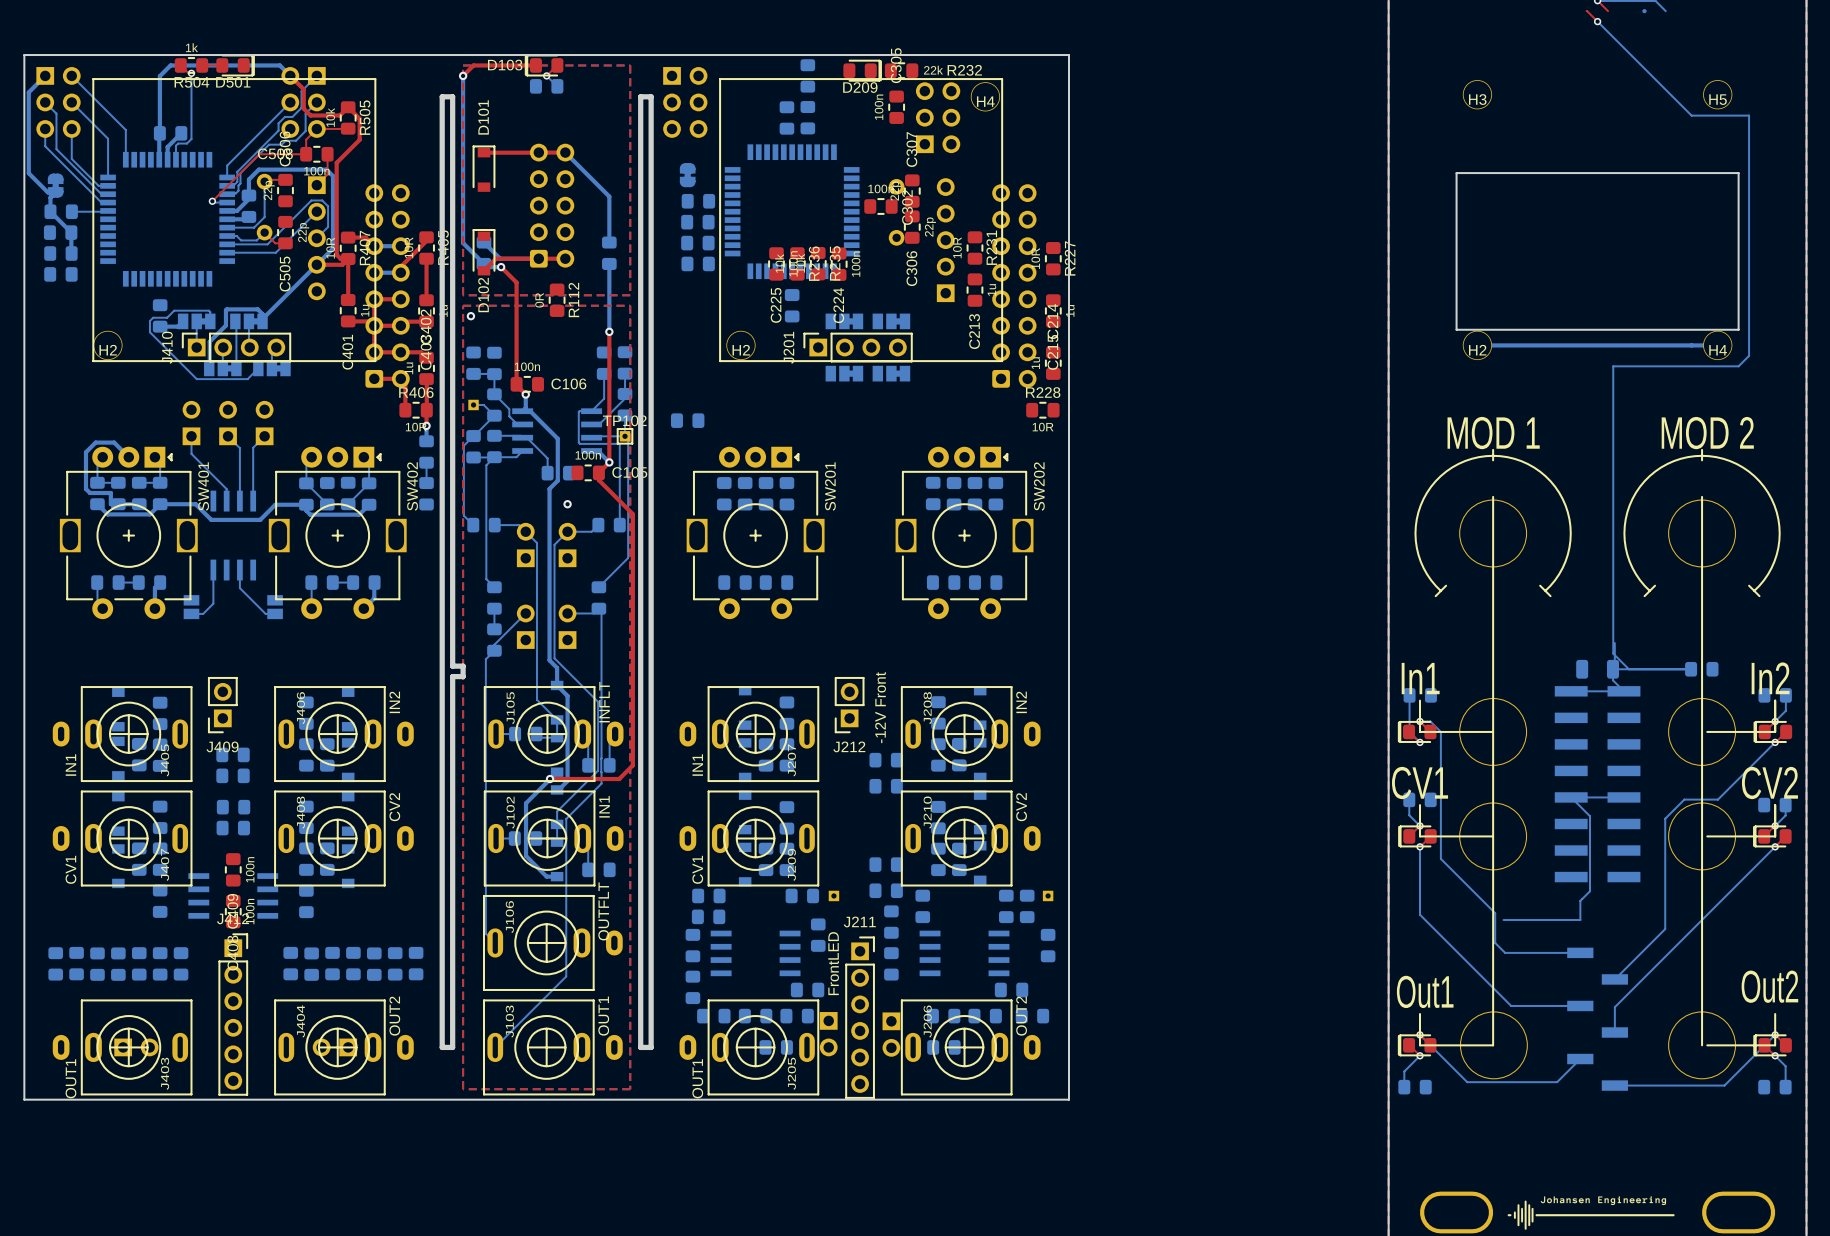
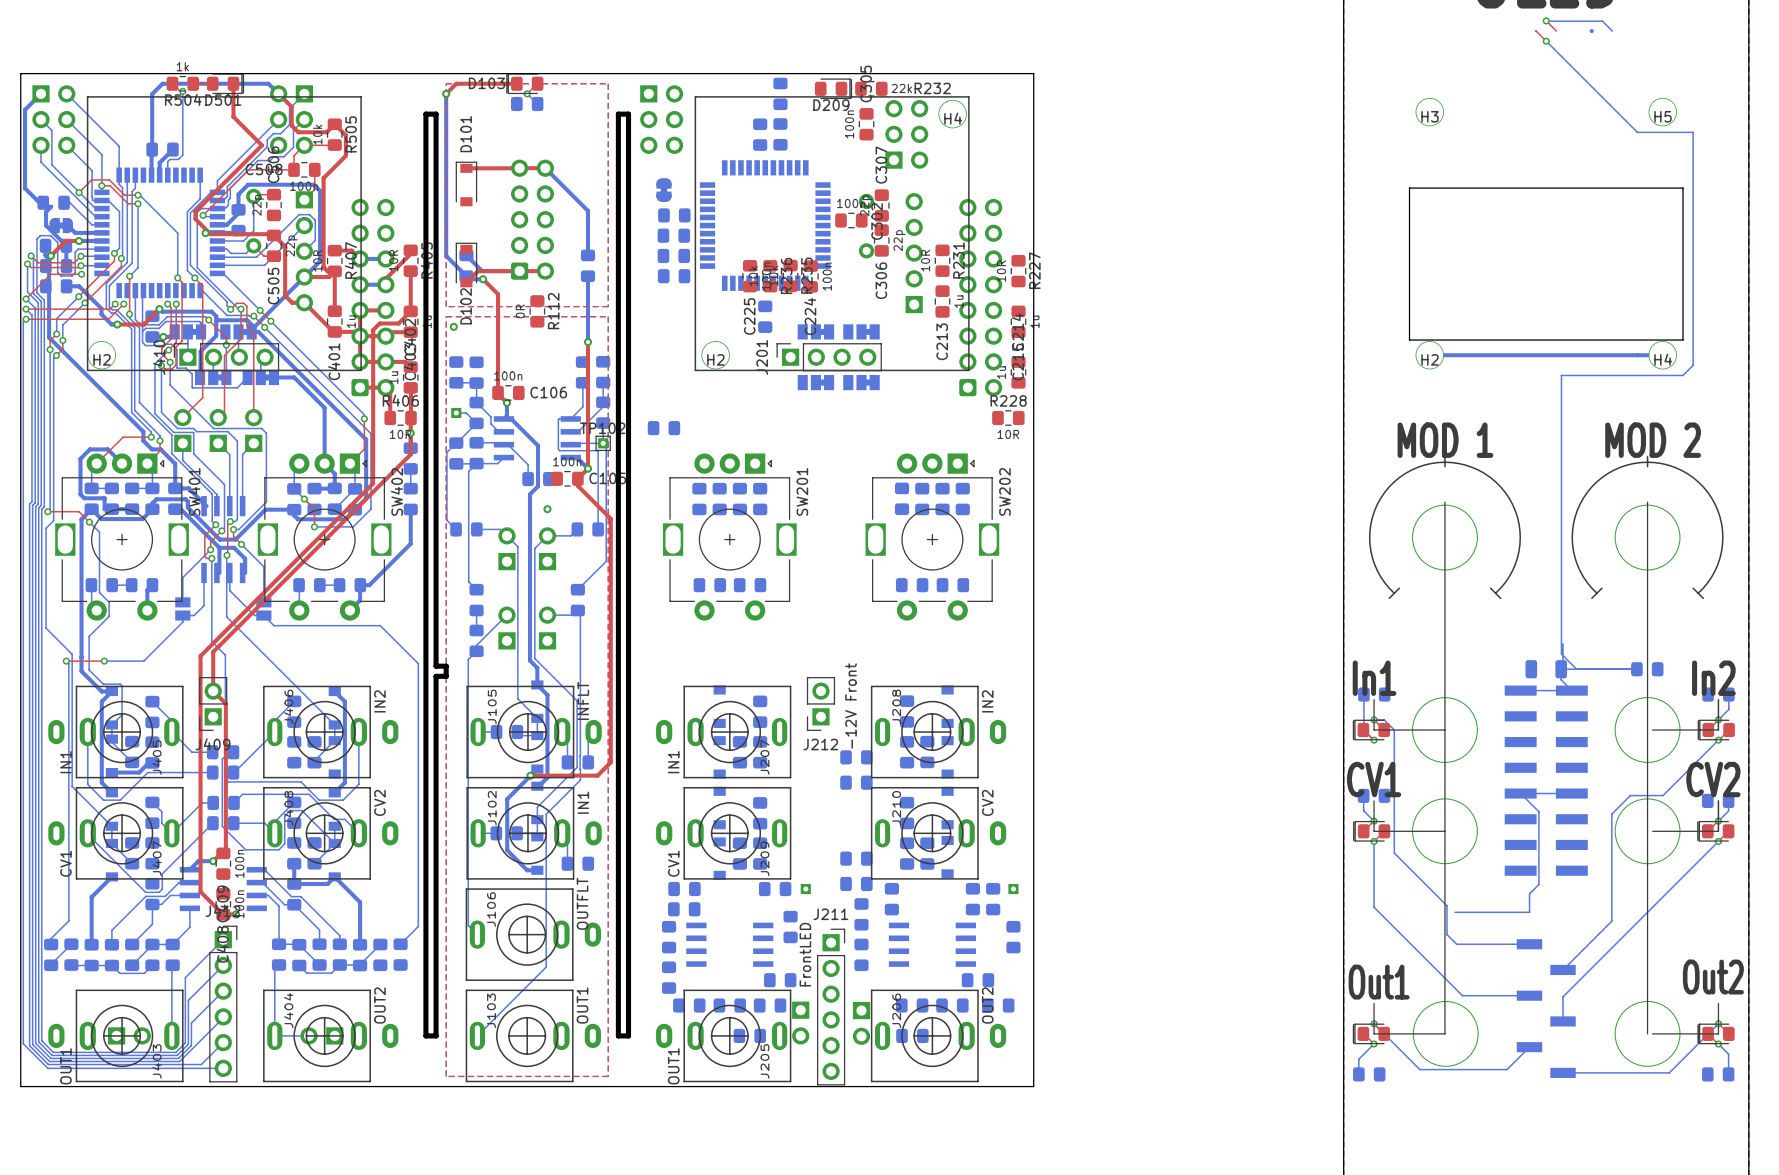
top track: none -> (233, 83) (233, 116) (261, 145) (195, 211) (195, 219) (210, 234) (272, 234) (285, 246) (285, 295) (292, 302) (304, 302) (334, 331)
bottom track: (71, 128) (71, 158) (98, 185) -> (66, 145) (92, 170) (92, 200)
bottom track: none -> (119, 175) (119, 184) (122, 187) (121, 258)
bottom track: none -> (127, 175) (127, 262) (106, 283) (106, 308) (111, 312) (115, 312) (131, 329) (131, 412) (151, 432) (151, 437)
bottom track: none -> (135, 175) (135, 188) (132, 191) (132, 263) (109, 285) (109, 306) (112, 309) (116, 309) (134, 327) (134, 410) (160, 435) (160, 440)
bottom track: none -> (200, 175) (200, 198) (187, 211) (187, 270) (194, 277)
top track: none -> (101, 185) (110, 185) (128, 203) (137, 203)
via: none -> (101, 185)
part footprint: [47, 173, 64, 198] -> [37, 195, 70, 210]
top track: none -> (78, 192) (91, 179) (109, 179) (124, 195) (137, 195)
via: none -> (78, 192)
bottom track: none -> (217, 192) (211, 192) (190, 212) (190, 265) (227, 301) (227, 305) (230, 309)
bottom track: none -> (137, 195) (177, 233) (177, 277)
via: none -> (137, 195)
bottom track: none -> (101, 200) (108, 200) (119, 211) (119, 248) (114, 253)
bottom track: none -> (64, 202) (69, 202) (91, 224) (101, 224)
bottom track: none -> (137, 203) (137, 267) (129, 276)
via: none -> (137, 203)
bottom track: none -> (217, 208) (201, 208) (197, 212) (197, 267) (238, 309) (241, 309)
part footprint: [44, 204, 78, 220] -> [49, 217, 73, 234]
bottom track: (71, 211) (107, 211) -> none
bottom track: none -> (67, 225) (75, 232) (101, 232)
via: none -> (205, 233)
bottom track: none -> (78, 241) (101, 241)
top track: none -> (78, 241) (65, 241) (50, 255)
via: none -> (78, 241)
bottom track: none -> (45, 245) (45, 255) (49, 258) (49, 337) (143, 431) (143, 440) (151, 449) (160, 449) (175, 463) (175, 488) (188, 488) (206, 506)
bottom track: none -> (101, 249) (78, 249) (75, 252) (75, 272) (72, 275) (61, 275) (57, 272) (57, 242) (50, 235) (40, 235) (36, 239) (36, 292) (44, 300) (44, 506) (41, 509) (41, 1040) (53, 1052) (175, 1052) (185, 1043) (185, 977) (223, 939)
top track: none -> (114, 253) (114, 260) (78, 296)
via: none -> (114, 253)
bottom track: none -> (31, 255) (33, 258) (33, 293) (41, 301) (41, 505) (38, 507) (38, 1041) (52, 1055) (177, 1055) (188, 1044) (188, 1000) (223, 965)
top track: none -> (31, 255) (37, 262) (74, 262) (81, 256)
via: none -> (31, 255)
via: none -> (50, 255)
bottom track: none -> (81, 256) (101, 257)
via: none -> (81, 256)
top track: none -> (121, 258) (121, 266) (85, 302)
via: none -> (121, 258)
bottom track: none -> (27, 264) (27, 292) (38, 302) (38, 504) (35, 506) (35, 1043) (50, 1058) (178, 1058) (191, 1045) (191, 1023) (223, 991)
top track: none -> (27, 264) (31, 267) (79, 267) (81, 265)
via: none -> (27, 264)
bottom track: none -> (101, 265) (81, 265)
via: none -> (81, 265)
top track: none -> (81, 274) (50, 274) (26, 298)
via: none -> (81, 274)
bottom track: none -> (217, 273) (223, 273) (260, 310)
top track: none -> (129, 276) (129, 314)
via: none -> (129, 276)
top track: none -> (177, 277) (182, 282) (182, 341) (175, 347) (175, 365) (171, 369) (165, 369) (161, 365)
via: none -> (177, 277)
top track: none -> (194, 277) (202, 285) (202, 397) (182, 417)
via: none -> (194, 277)
bottom track: none -> (66, 286) (79, 286) (101, 308) (101, 314) (111, 324) (117, 324)
bottom track: none -> (135, 290) (135, 319) (142, 326) (142, 331)
bottom track: none -> (143, 290) (142, 321) (145, 324) (159, 324) (167, 316) (205, 316) (208, 319)
bottom track: none -> (200, 290) (227, 315) (253, 316)
bottom track: none -> (78, 296) (56, 318) (56, 334)
via: none -> (78, 296)
bottom track: none -> (26, 298) (35, 308) (35, 502) (32, 505) (32, 1044) (49, 1061) (179, 1061) (223, 1016)
via: none -> (26, 298)
bottom track: none -> (85, 302) (62, 325) (62, 340)
via: none -> (85, 302)
top track: none -> (115, 304) (110, 309) (26, 309)
via: none -> (115, 304)
top track: none -> (123, 304) (108, 319) (26, 319)
via: none -> (123, 304)
top track: none -> (167, 304) (171, 307) (171, 338) (161, 348) (161, 353) (170, 362)
via: none -> (167, 304)
top track: none -> (176, 304) (176, 342) (168, 350)
via: none -> (176, 304)
bottom track: none -> (26, 309) (31, 315) (31, 501) (29, 504) (29, 1045) (48, 1064) (201, 1064) (223, 1042)
via: none -> (26, 309)
top track: none -> (159, 309) (144, 324) (117, 324)
via: none -> (159, 309)
top track: none -> (241, 309) (241, 339) (224, 355) (224, 411) (218, 417)
via: none -> (241, 309)
top track: none -> (230, 309) (236, 303) (243, 303) (246, 306) (246, 325) (253, 332) (253, 417)
via: none -> (230, 309)
top track: none -> (260, 310) (270, 321)
via: none -> (260, 310)
top track: none -> (410, 311) (398, 323) (379, 323) (373, 330) (373, 483) (200, 656) (200, 891) (223, 914) (235, 914)
bottom track: none -> (129, 314) (129, 318) (139, 327) (139, 402) (171, 434) (171, 453) (212, 494) (212, 521) (215, 524)
via: none -> (129, 314)
bottom track: none -> (152, 316) (159, 308) (162, 311) (211, 311) (216, 316) (216, 321)
top track: none -> (253, 316) (264, 327)
via: none -> (253, 316)
bottom track: none -> (26, 319) (23, 322) (23, 1043) (47, 1068) (223, 1068)
via: none -> (26, 319)
top track: none -> (208, 319) (226, 337) (226, 345)
via: none -> (208, 319)
bottom track: none -> (270, 321) (364, 414) (364, 418)
via: none -> (270, 321)
via: none -> (117, 324)
bottom track: none -> (264, 327) (370, 433) (370, 509) (353, 526) (314, 526)
via: none -> (264, 327)
bottom track: none -> (251, 331) (258, 331) (366, 439) (366, 498) (355, 509)
top track: none -> (56, 334) (50, 340) (50, 349)
via: none -> (56, 334)
via: none -> (163, 336)
top track: none -> (62, 340) (62, 349) (56, 355)
via: none -> (62, 340)
via: none -> (226, 345)
bottom track: (153, 335) (196, 379) (201, 379) -> (145, 345) (171, 344) (176, 349) (176, 367) (186, 368) (192, 374) (192, 387)
bottom track: none -> (50, 349) (50, 509) (47, 511)
via: none -> (50, 349)
bottom track: none -> (168, 350) (154, 363) (154, 413) (173, 432) (193, 432) (193, 453) (224, 484) (224, 528) (221, 530)
via: none -> (168, 350)
bottom track: none -> (56, 355) (53, 358) (53, 520) (46, 528) (46, 628) (72, 654) (72, 786) (111, 826) (111, 843) (132, 863)
via: none -> (56, 355)
bottom track: none -> (170, 362) (170, 385) (213, 428) (261, 428) (266, 433) (266, 501) (238, 529) (233, 529)
via: none -> (170, 362)
bottom track: none -> (161, 365) (161, 412) (177, 428) (193, 428) (196, 431) (227, 431) (237, 441) (237, 519) (230, 521)
via: none -> (161, 365)
bottom track: none -> (273, 377) (294, 377) (324, 407) (324, 463) (334, 473) (334, 488) (314, 488)
top track: none -> (364, 418) (364, 449) (349, 463)
via: none -> (364, 418)
top track: none -> (410, 433) (410, 454) (213, 651) (213, 691) (225, 703) (225, 850) (213, 861)
top track: none -> (151, 437) (123, 437) (96, 463)
via: none -> (151, 437)
top track: none -> (160, 440) (160, 450) (147, 463)
via: none -> (160, 440)
part: none -> (175, 498)
top track: none -> (304, 499) (314, 509) (314, 526)
via: none -> (304, 499)
bottom track: none -> (91, 509) (81, 519) (81, 671) (101, 691) (111, 691) (101, 701) (101, 782) (111, 792)
bottom track: (160, 504) (183, 504) -> none
bottom track: (189, 504) (195, 504) (211, 519) (260, 519) (276, 504) -> (152, 509) (152, 503) (156, 499) (185, 499) (187, 501) (187, 507) (219, 539) (235, 539) (265, 509)
bottom track: none -> (180, 509) (219, 547)
bottom track: none -> (410, 509) (410, 543) (369, 585) (360, 585)
top track: none -> (47, 511) (78, 511) (89, 522)
via: none -> (47, 511)
top track: none -> (230, 521) (227, 524) (227, 555)
via: none -> (230, 521)
bottom track: none -> (89, 522) (99, 532) (99, 592) (109, 602) (109, 616) (89, 636) (89, 669) (103, 683) (120, 684) (122, 685) (122, 714) (111, 724) (111, 742) (132, 762)
via: none -> (89, 522)
top track: none -> (215, 524) (204, 535) (204, 556) (211, 558)
via: none -> (215, 524)
via: none -> (314, 526)
top track: none -> (233, 529) (233, 536) (241, 544)
via: none -> (233, 529)
top track: none -> (221, 530) (210, 542) (210, 549)
via: none -> (221, 530)
bottom track: none -> (241, 544) (263, 566) (263, 602)
via: none -> (241, 544)
bottom track: none -> (219, 547) (219, 573)
bottom track: none -> (219, 547) (234, 547) (245, 558) (245, 573)
bottom track: none -> (210, 549) (182, 577) (182, 602)
via: none -> (210, 549)
bottom track: none -> (227, 555) (226, 616) (334, 724) (334, 740) (314, 762)
via: none -> (227, 555)
bottom track: none -> (211, 558) (211, 641) (225, 655) (225, 756) (222, 759) (222, 826) (245, 849) (278, 849) (284, 844) (284, 816) (290, 810) (301, 810) (334, 843)
via: none -> (211, 558)
bottom track: none -> (182, 615) (182, 622) (143, 661) (104, 661)
bottom track: none -> (263, 615) (273, 625) (380, 625) (418, 663) (418, 926) (400, 944)
bottom track: none -> (66, 661) (68, 663) (68, 920) (51, 938) (51, 944)
top track: none -> (66, 661) (104, 661)
via: none -> (66, 661)
via: none -> (104, 661)
bottom track: none -> (334, 691) (344, 701) (344, 782) (334, 792)
bottom track: none -> (152, 701) (171, 721) (171, 732) (192, 752) (212, 752)
bottom track: none -> (294, 701) (274, 720) (274, 732) (233, 772)
bottom track: none -> (87, 732) (87, 784) (103, 800) (120, 800) (147, 772) (212, 772)
bottom track: none -> (358, 732) (358, 784) (343, 800) (319, 800) (301, 781) (228, 781) (225, 779) (225, 760) (233, 752)
bottom track: none -> (152, 762) (148, 762) (139, 772) (111, 772)
bottom track: none -> (152, 802) (161, 811) (161, 823) (171, 833) (202, 802) (213, 802)
bottom track: none -> (294, 802) (274, 821) (274, 833) (264, 823) (233, 823)
bottom track: none -> (233, 802) (242, 794) (309, 794) (334, 819) (344, 819) (358, 833)
bottom track: none -> (212, 823) (162, 873) (162, 889) (159, 892) (145, 892) (87, 833)
bottom track: none -> (334, 826) (334, 843)
bottom track: none -> (334, 843) (314, 863)
bottom track: none -> (213, 861) (198, 861) (189, 869)
via: none -> (213, 861)
bottom track: none -> (294, 863) (294, 883) (327, 883) (334, 876) (360, 902) (360, 944)
bottom track: none -> (256, 869) (264, 869) (291, 896) (300, 896) (339, 935) (339, 944)
bottom track: none -> (111, 876) (91, 897) (91, 944)
bottom track: none -> (189, 882) (179, 882) (165, 896) (145, 896) (111, 930) (111, 944)
bottom track: none -> (256, 882) (262, 882) (284, 904) (294, 904) (319, 930) (319, 944)
bottom track: none -> (189, 895) (170, 895) (161, 904) (152, 904) (152, 924) (132, 944)
bottom track: none -> (256, 895) (268, 895) (279, 906) (279, 944) (298, 944) (319, 965)
bottom track: none -> (189, 908) (189, 927) (172, 944) (152, 944) (132, 965)
via: none -> (235, 914)
bottom track: none -> (71, 944) (51, 965)
bottom track: none -> (380, 944) (360, 965) (339, 965) (331, 973) (306, 973) (299, 965)
bottom track: none -> (71, 965) (111, 965) (119, 973) (144, 973) (152, 965)
bottom track: none -> (172, 965) (171, 1035)
bottom track: none -> (279, 965) (274, 969) (274, 1035) (309, 1035)

